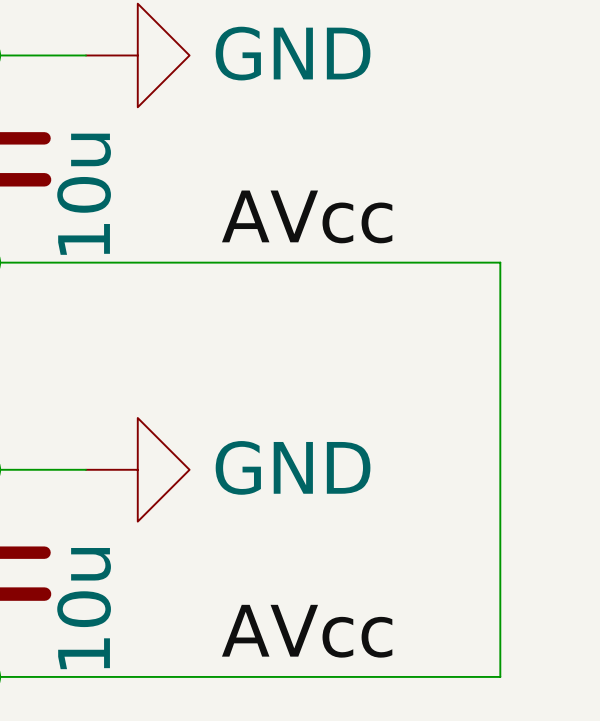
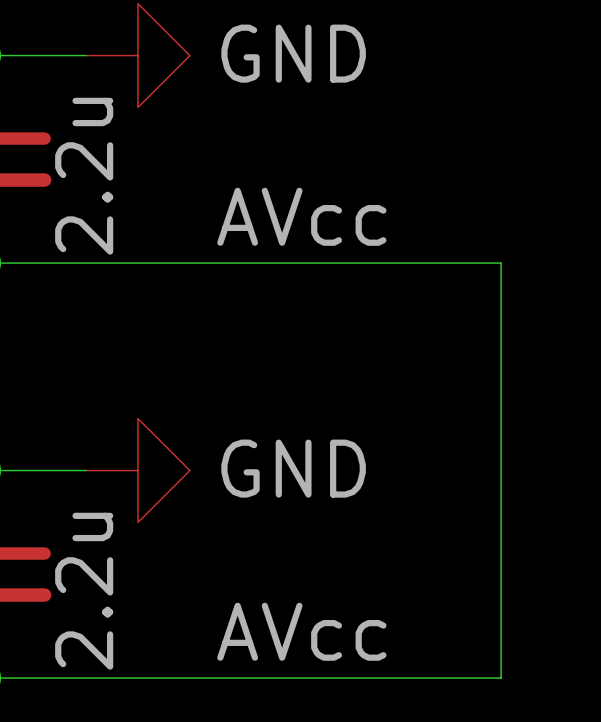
part value: 10u (84, 194) -> 2.2u (84, 176)
part value: 10u (84, 608) -> 2.2u (84, 591)

